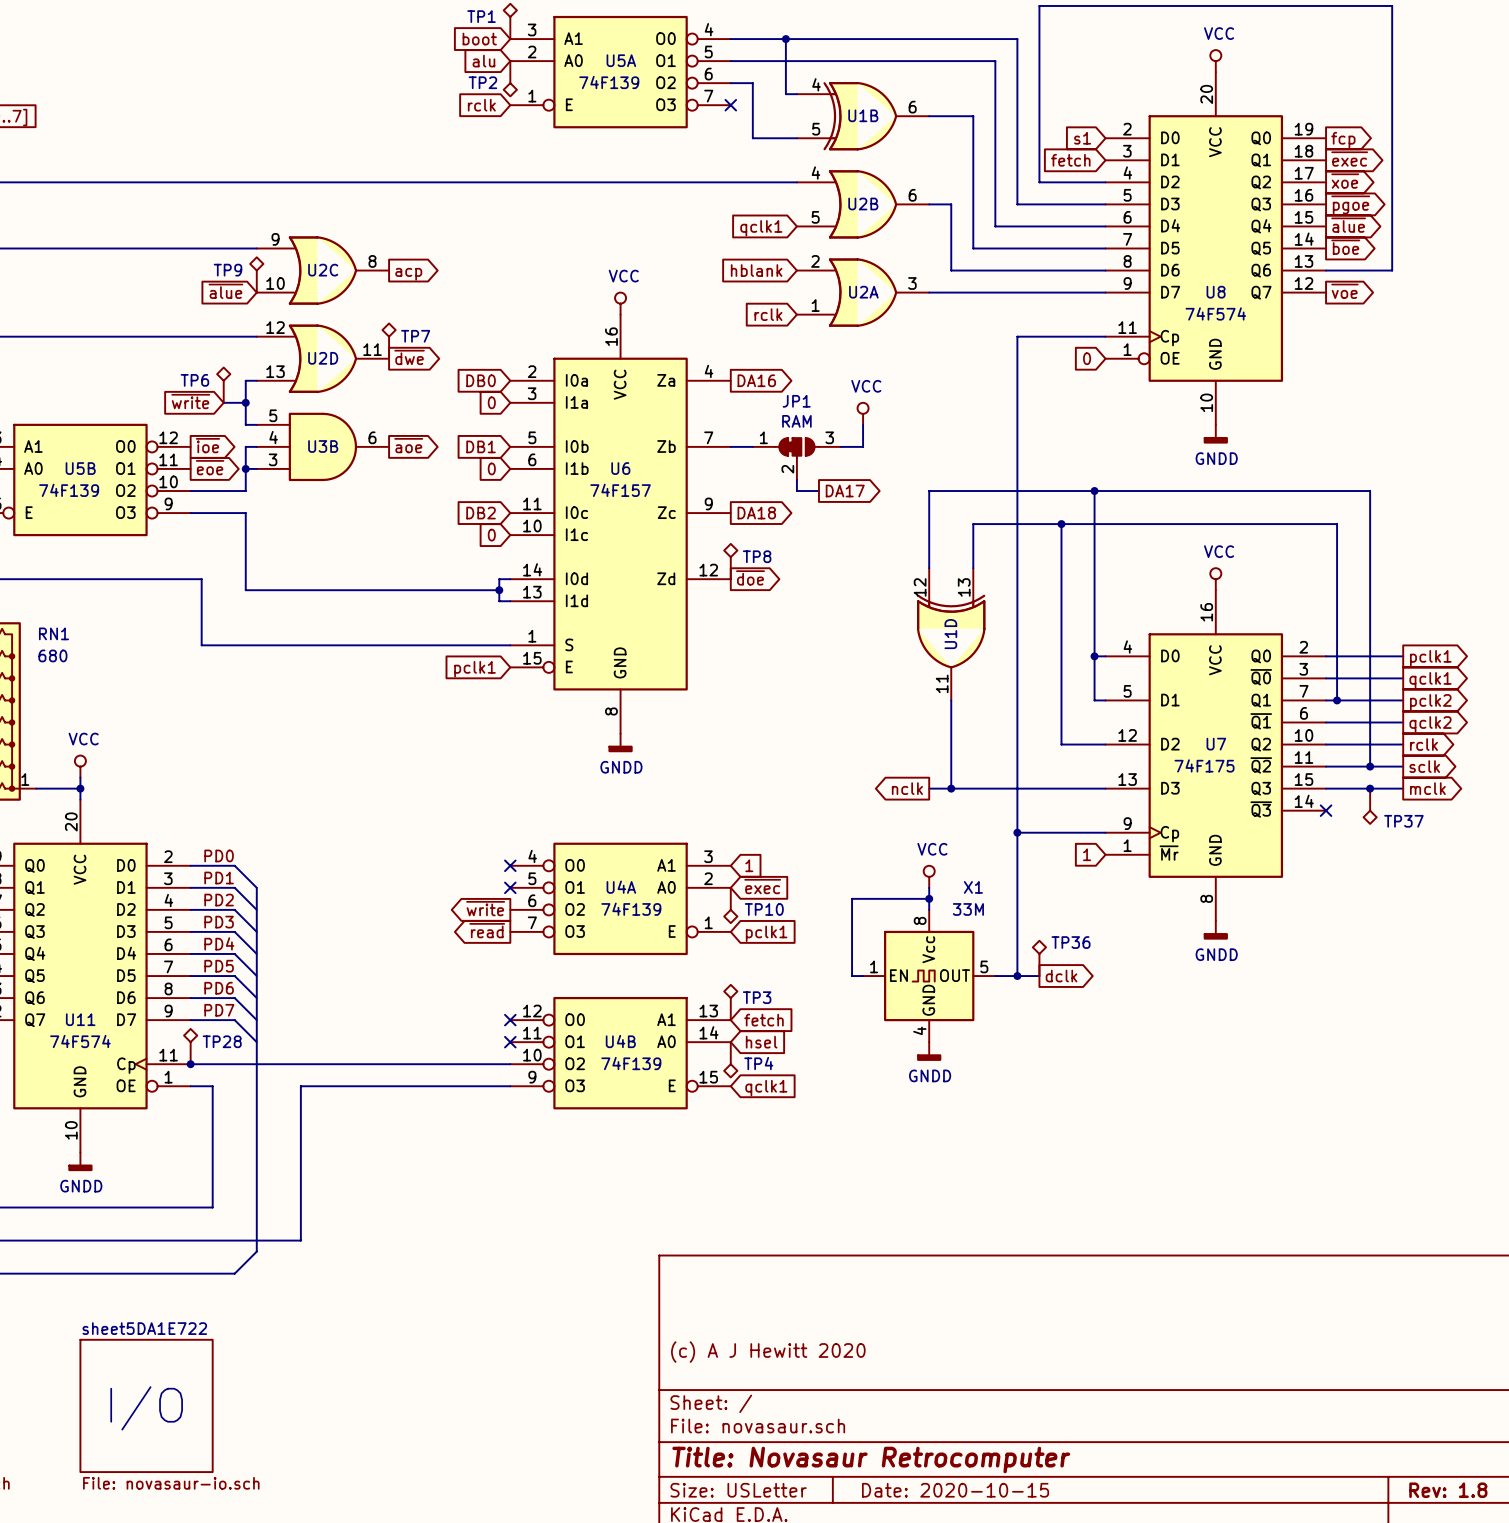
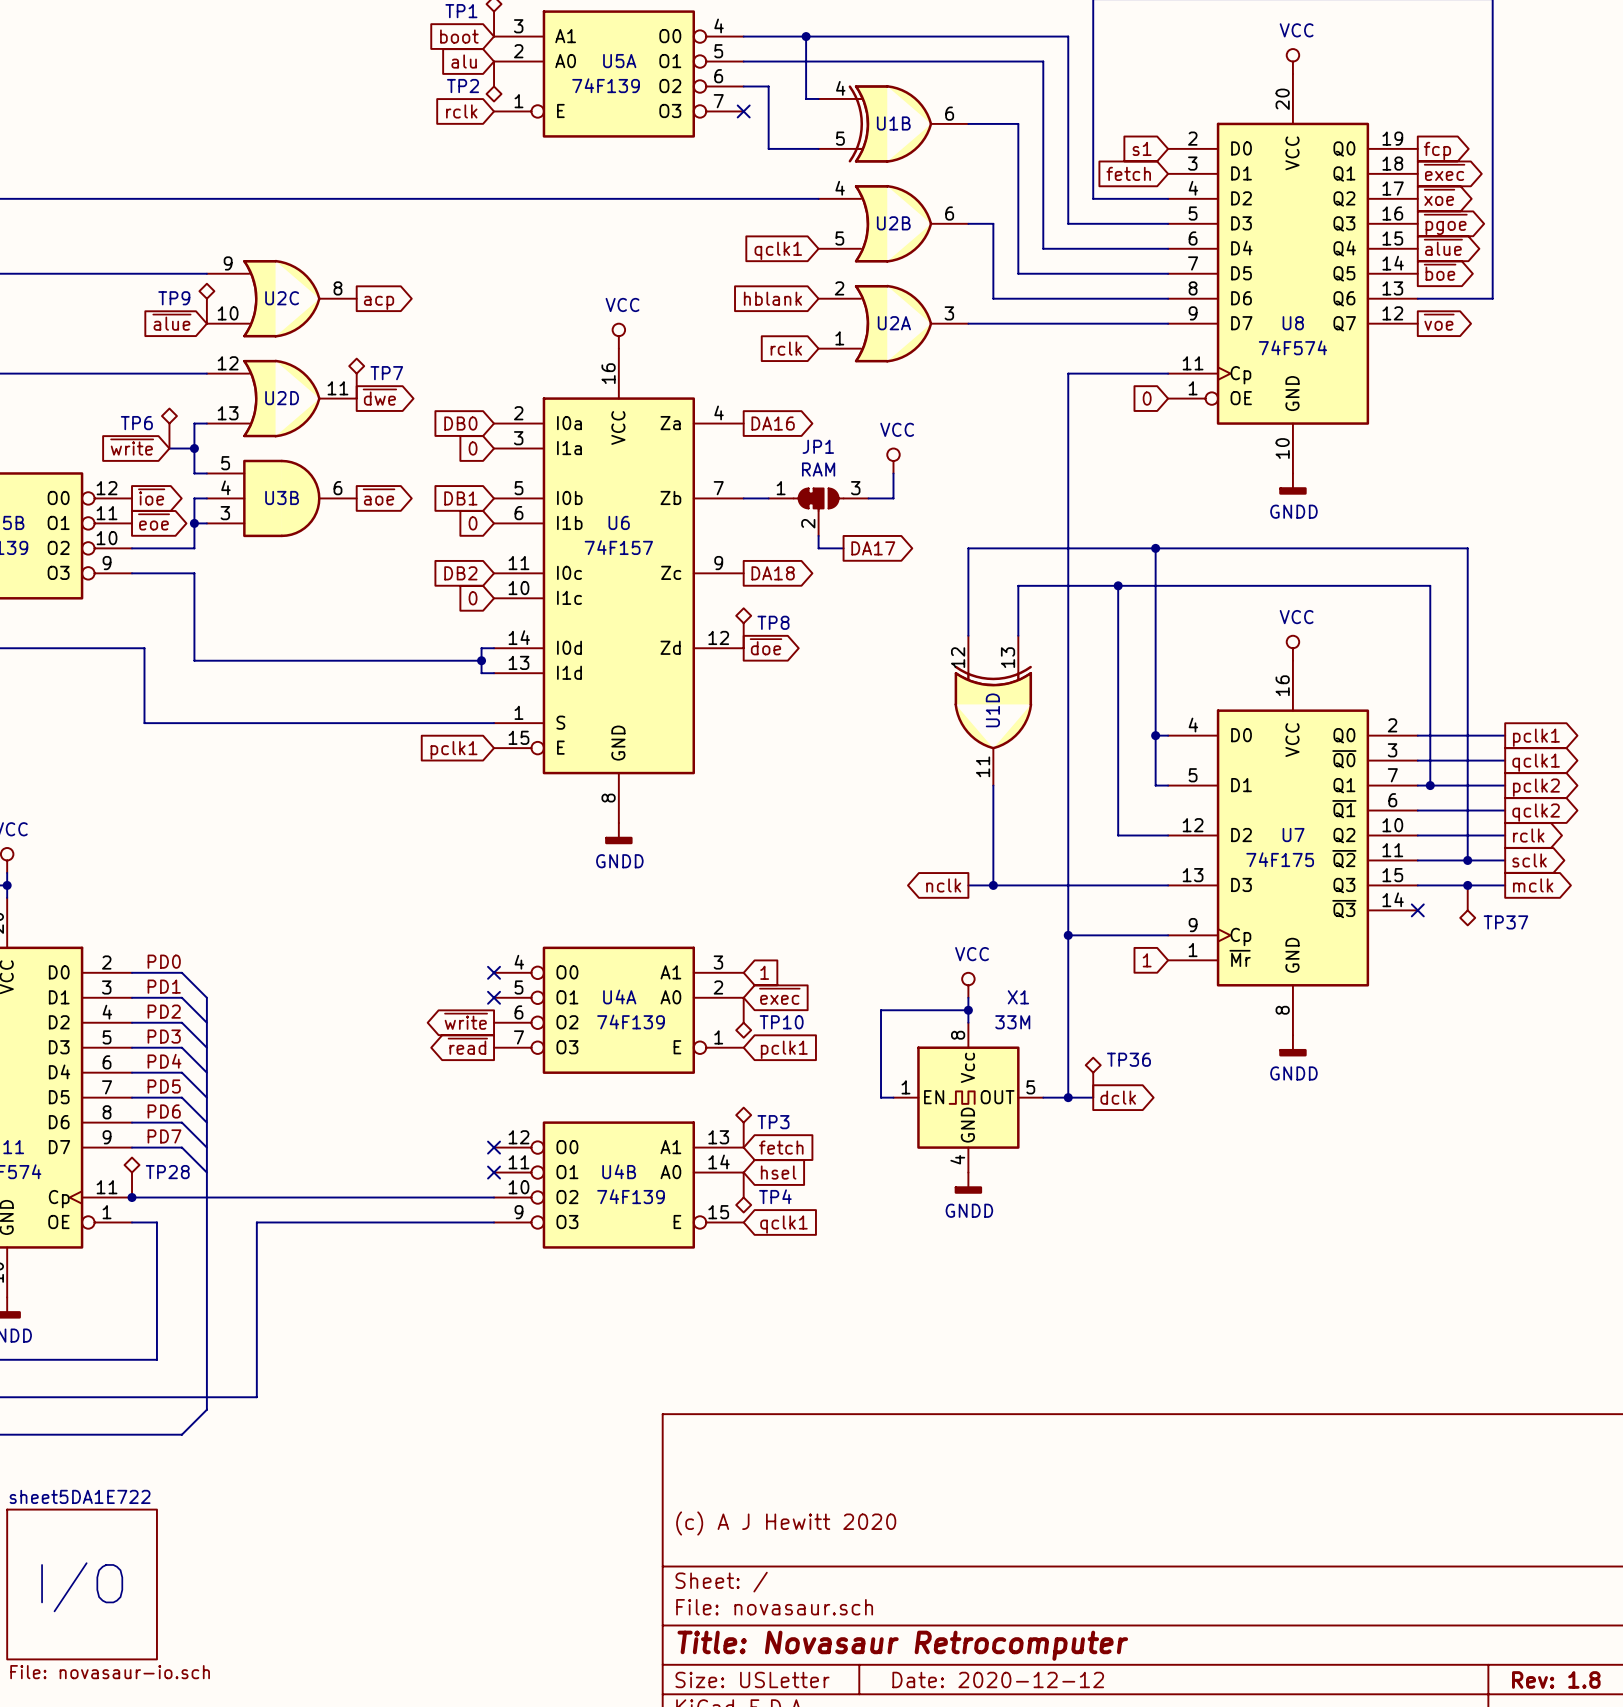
title block: Date: 2020-10-15 (955, 1490) -> Date: 2020-12-12 (998, 1679)

